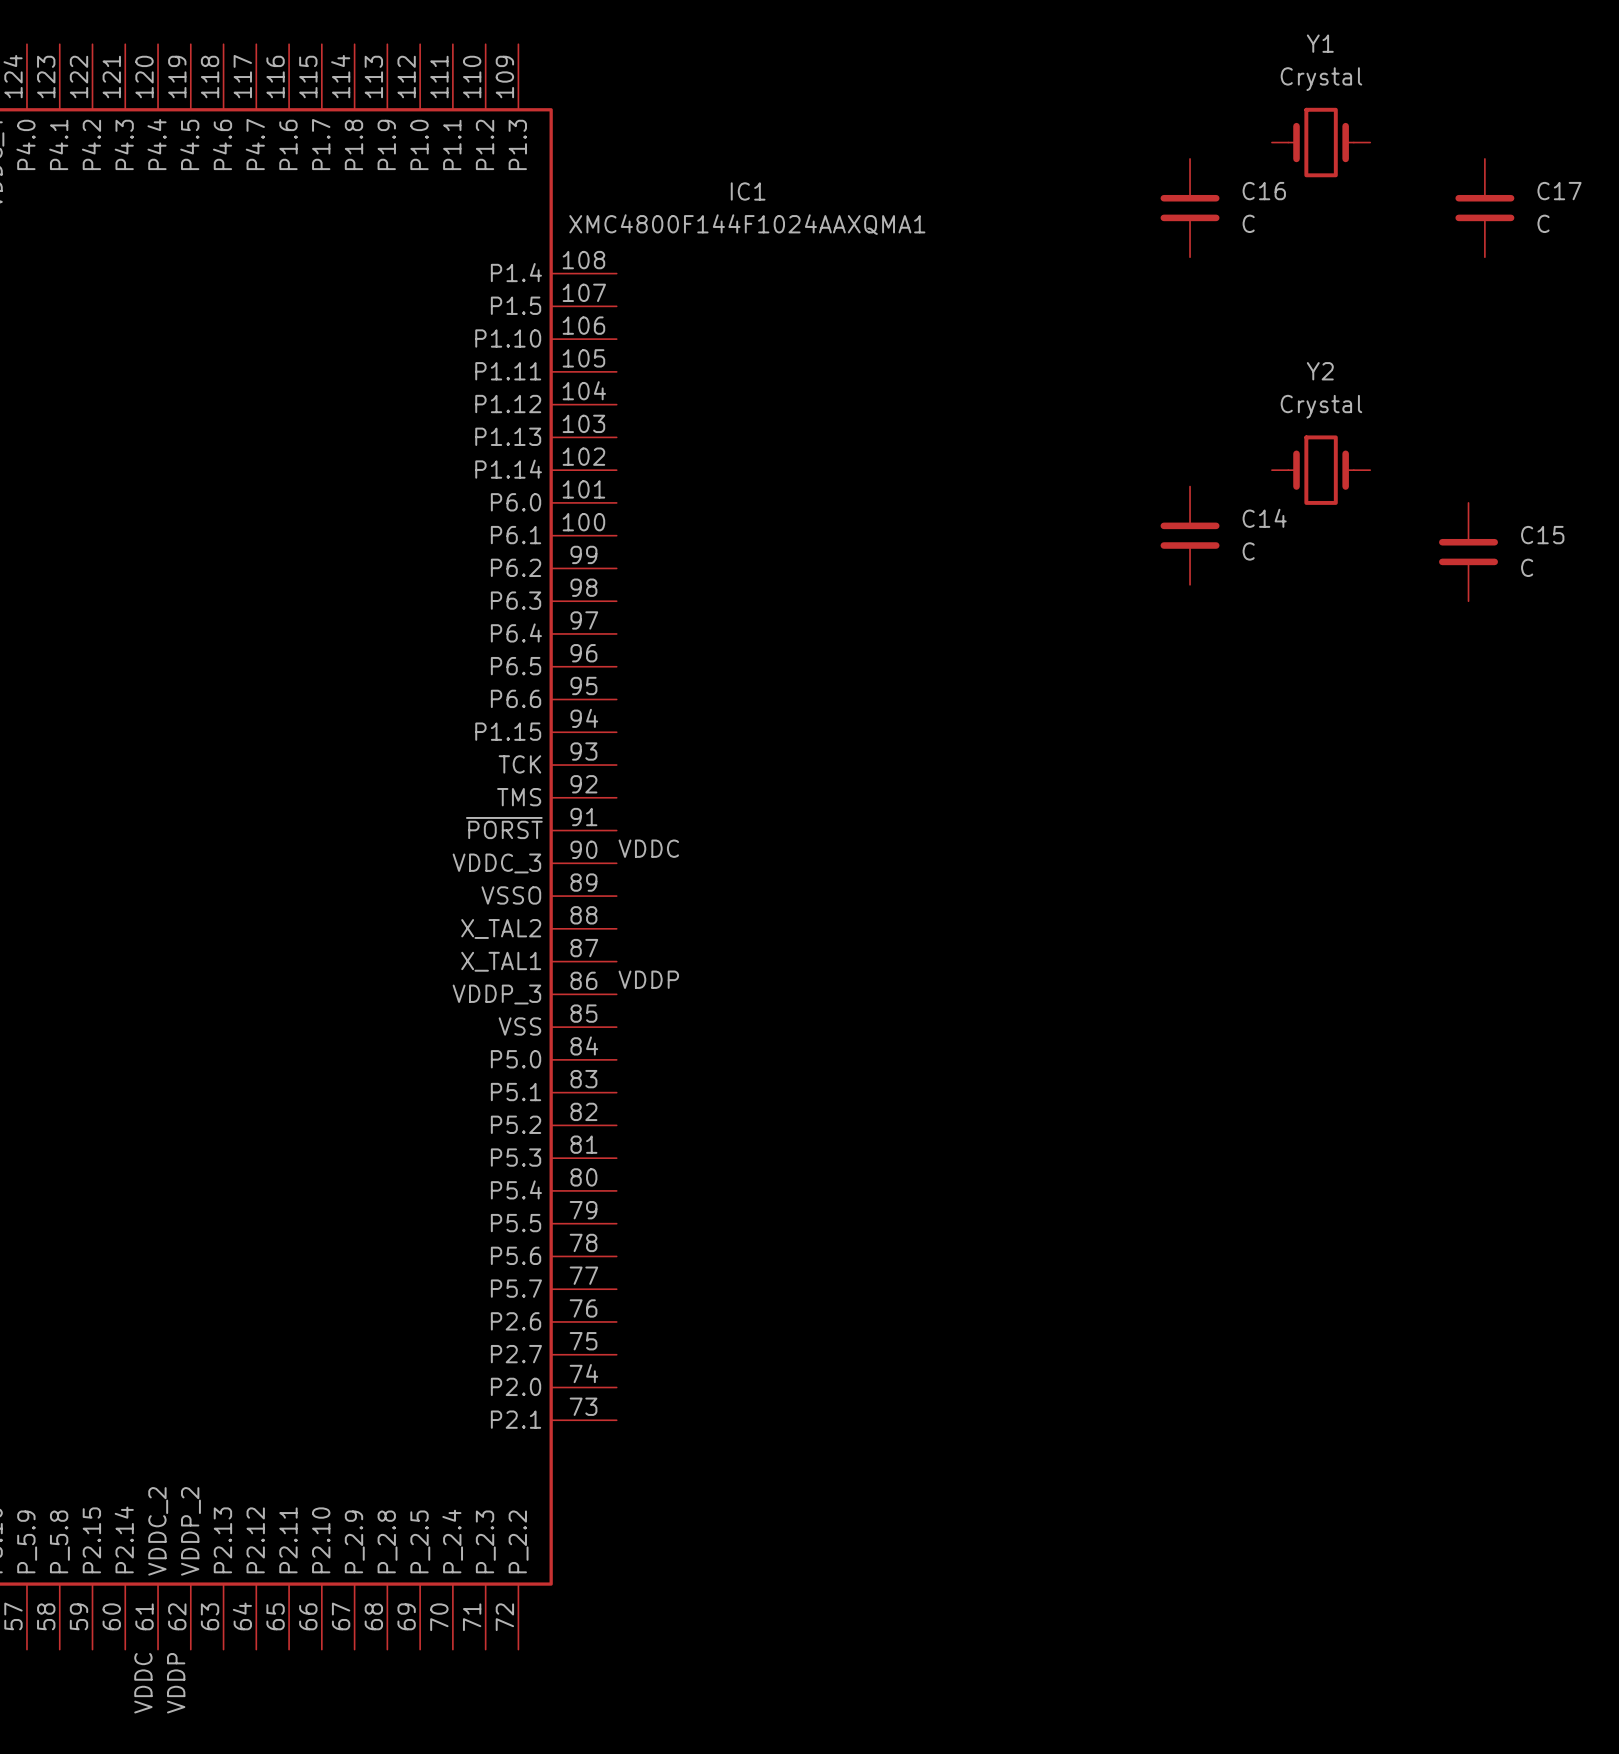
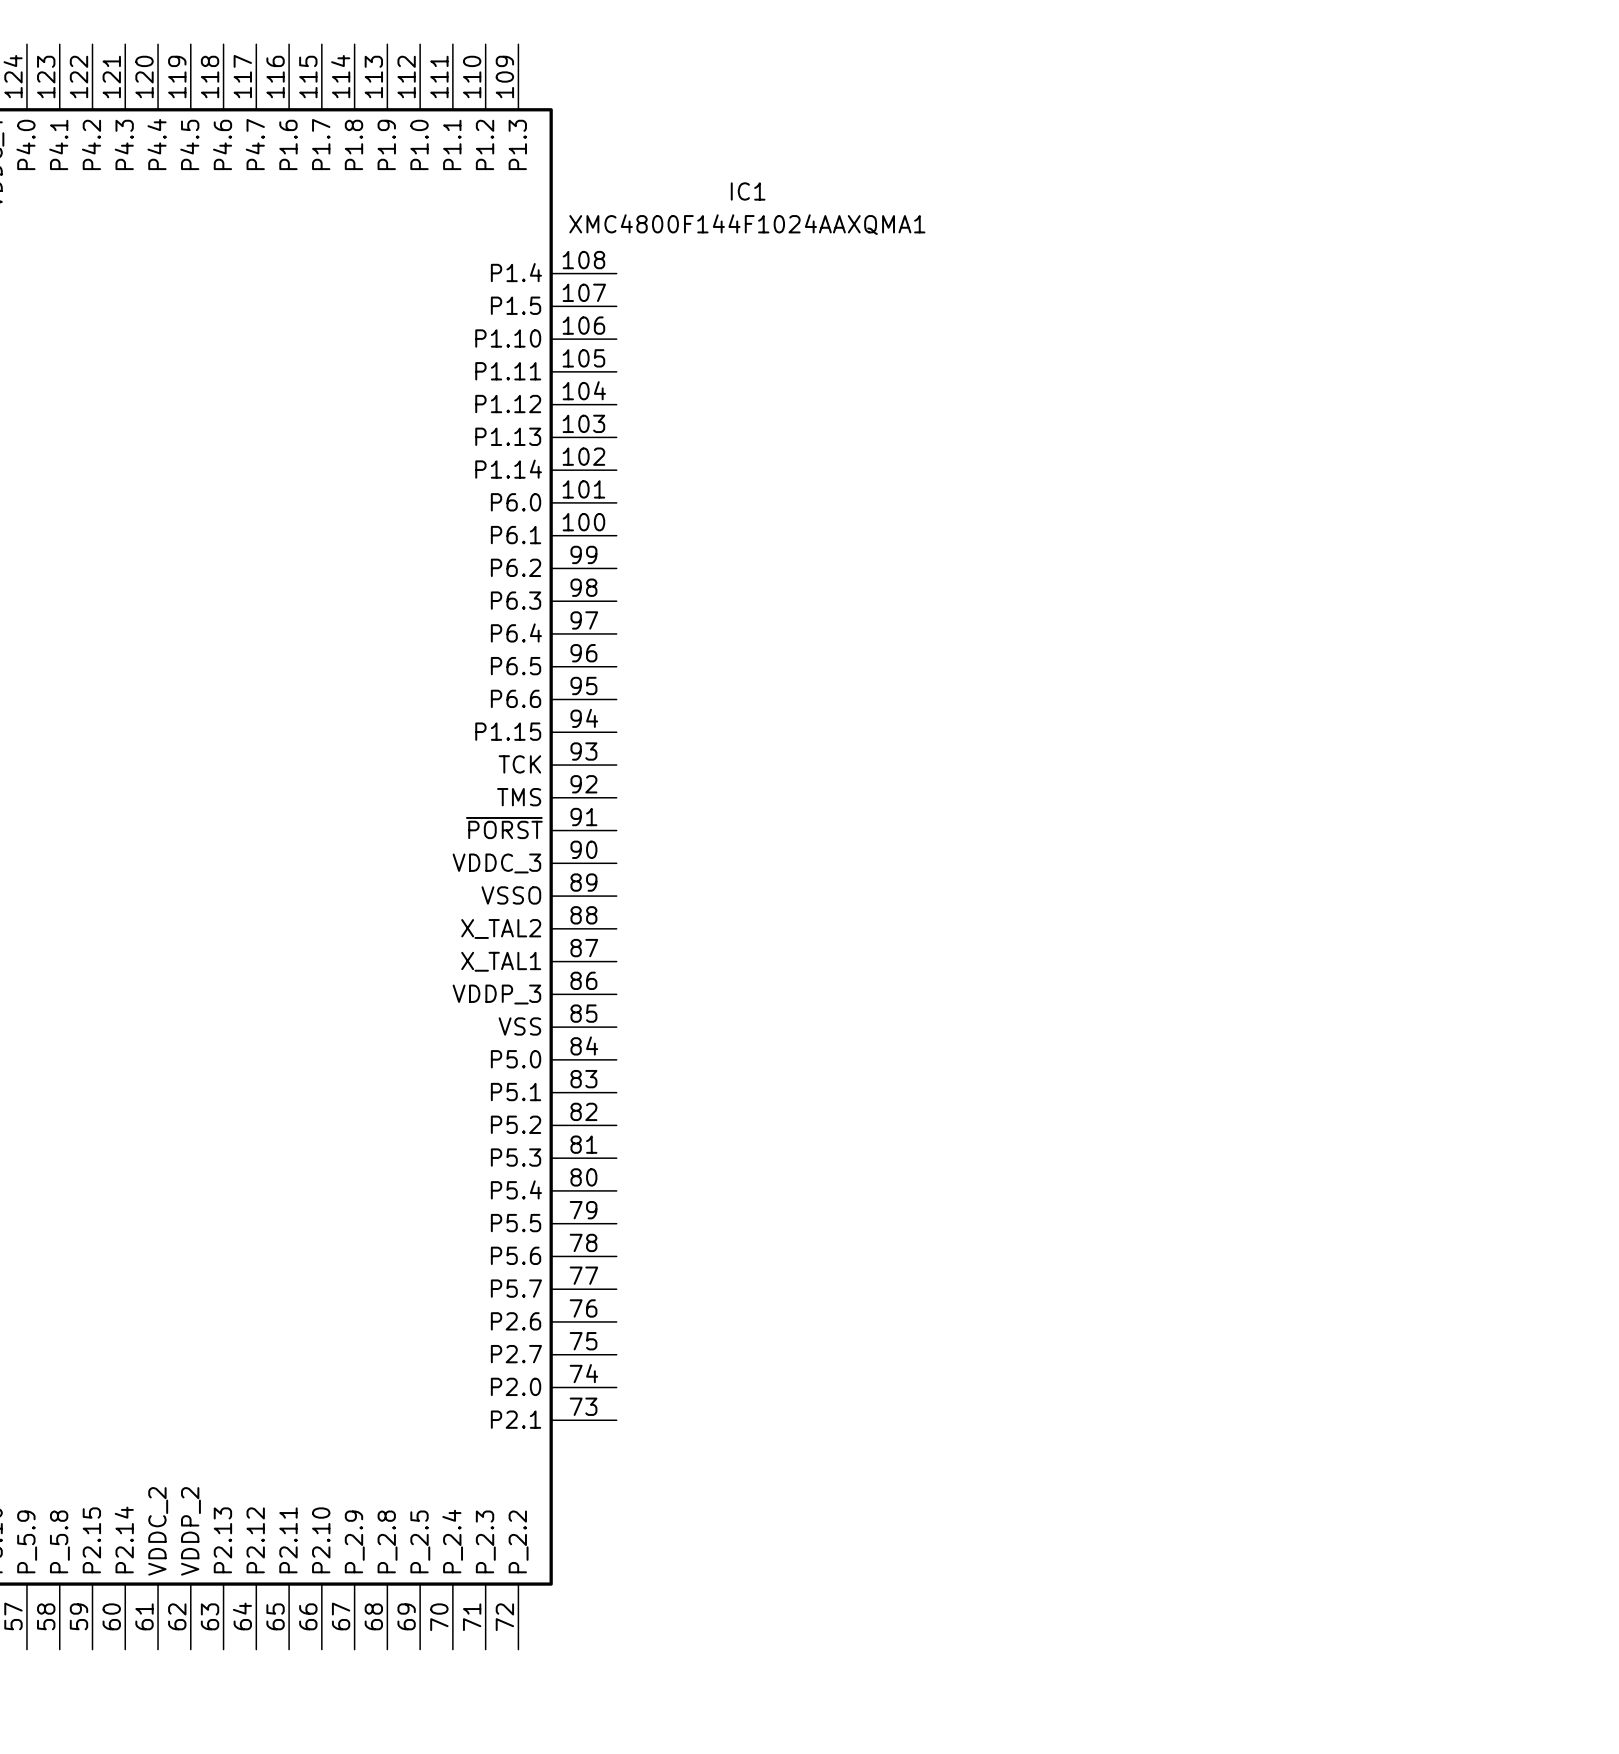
Y1: Crystal (1321, 142) -> none
C16: C (1190, 208) -> none
C17: C (1484, 208) -> none
Y2: Crystal (1321, 470) -> none
C14: C (1190, 535) -> none
C15: C (1468, 552) -> none
label: VDDC (648, 848) -> none
label: VDDP (648, 979) -> none
label: VDDC (143, 1683) -> none
label: VDDP (176, 1683) -> none

